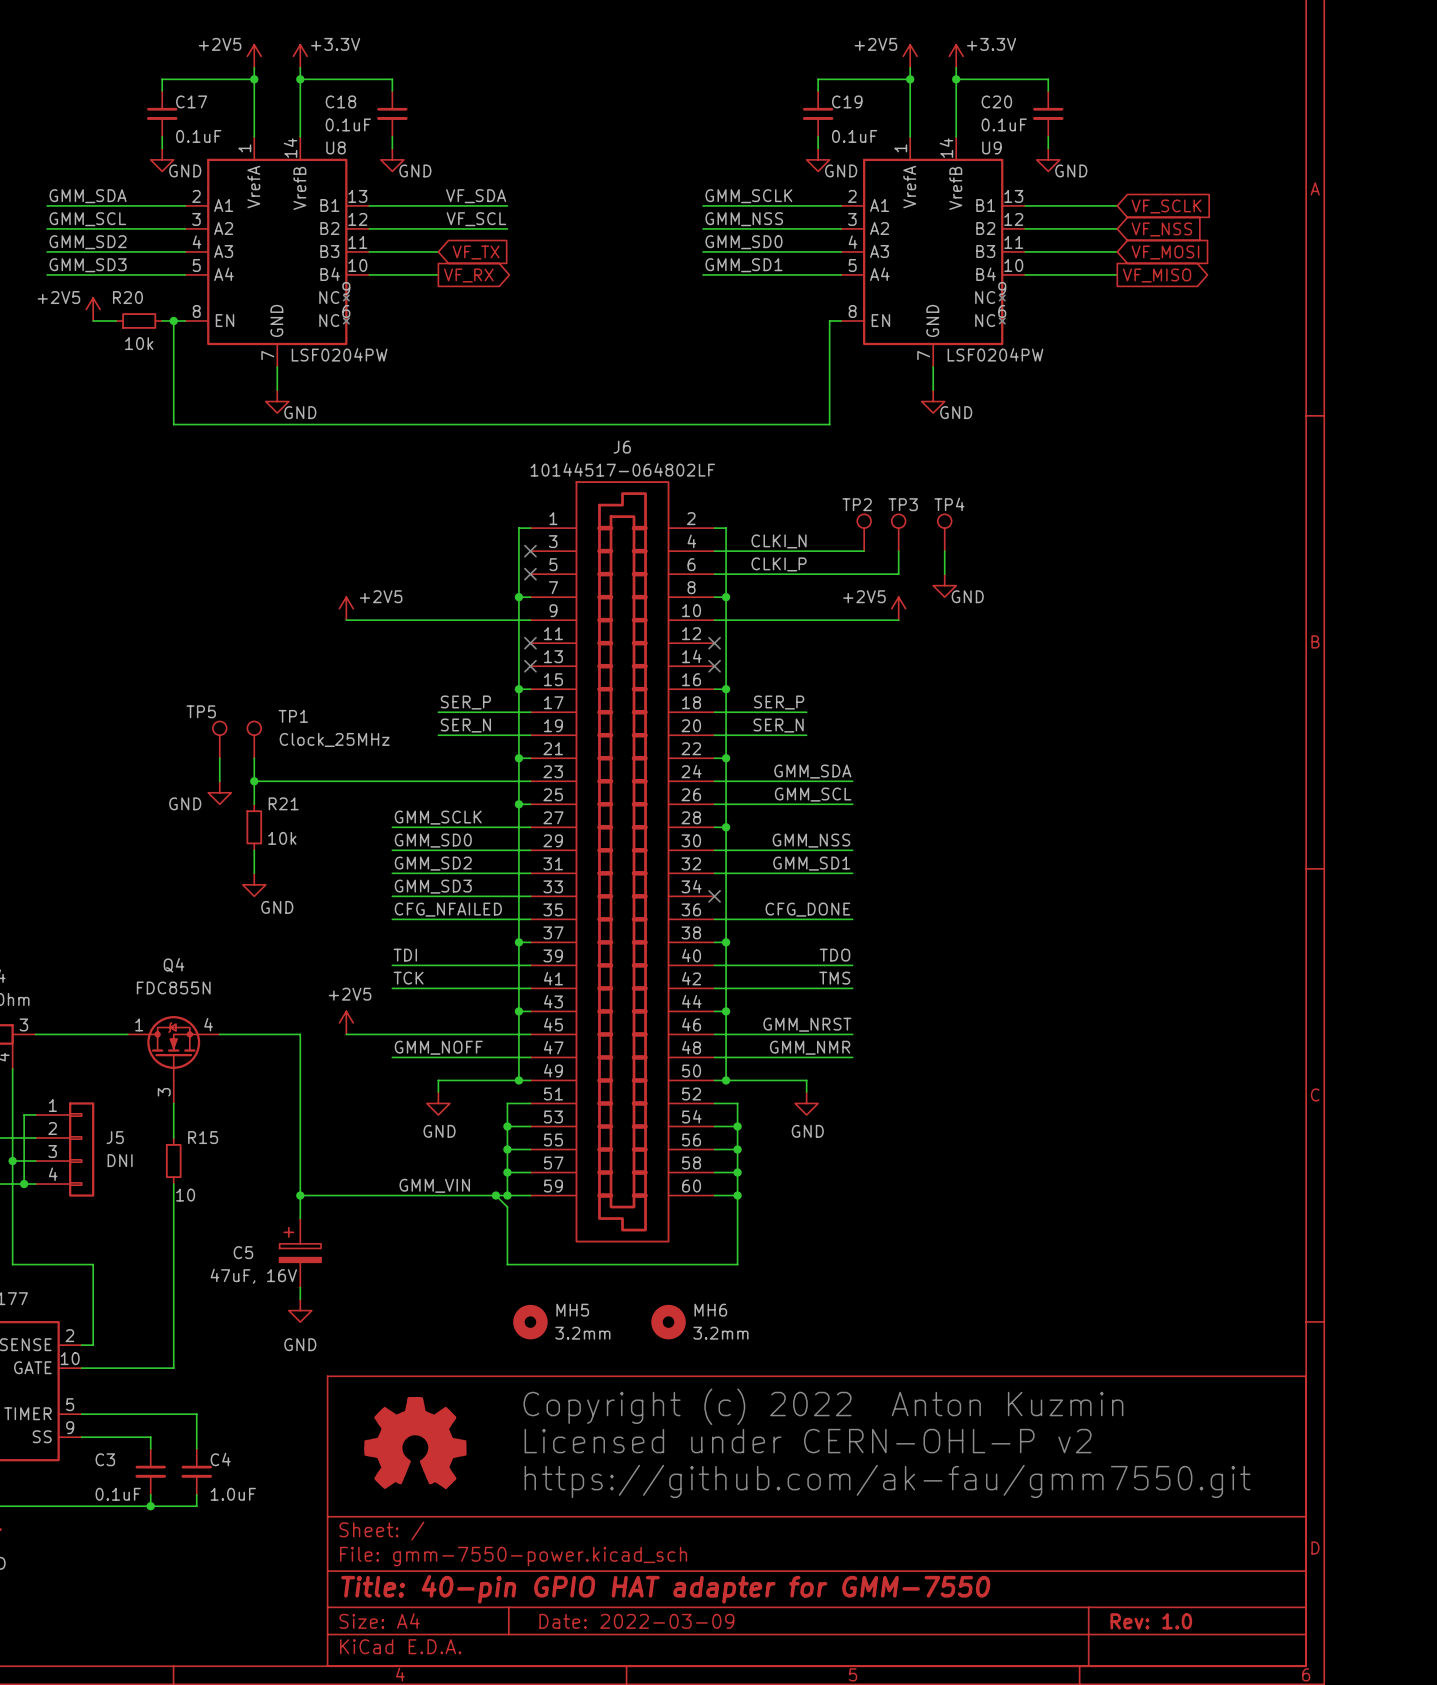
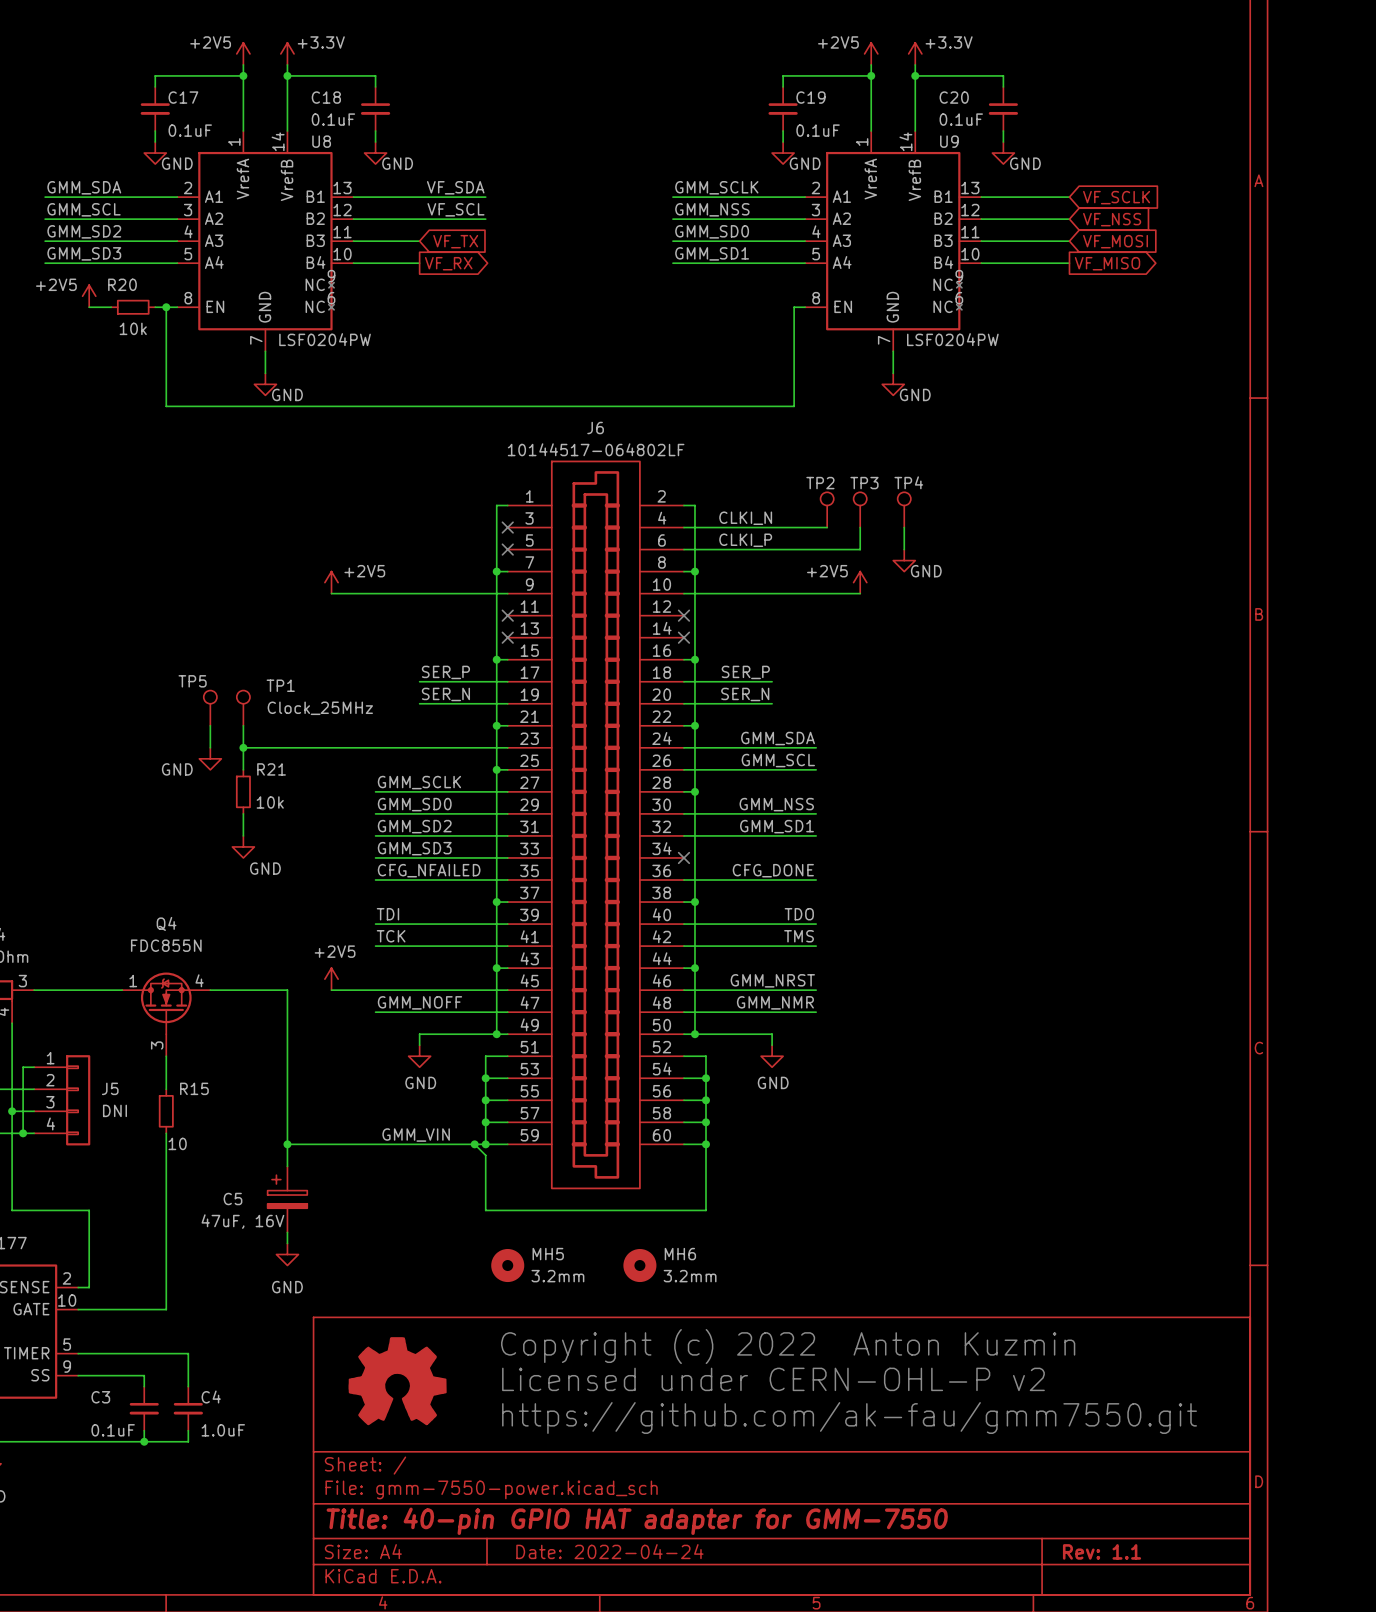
title block: Date: 2022-03-09 (636, 1621) -> Date: 2022-04-24 (609, 1551)
title block: Rev: 1.0 (1151, 1621) -> Rev: 1.1 (1102, 1551)

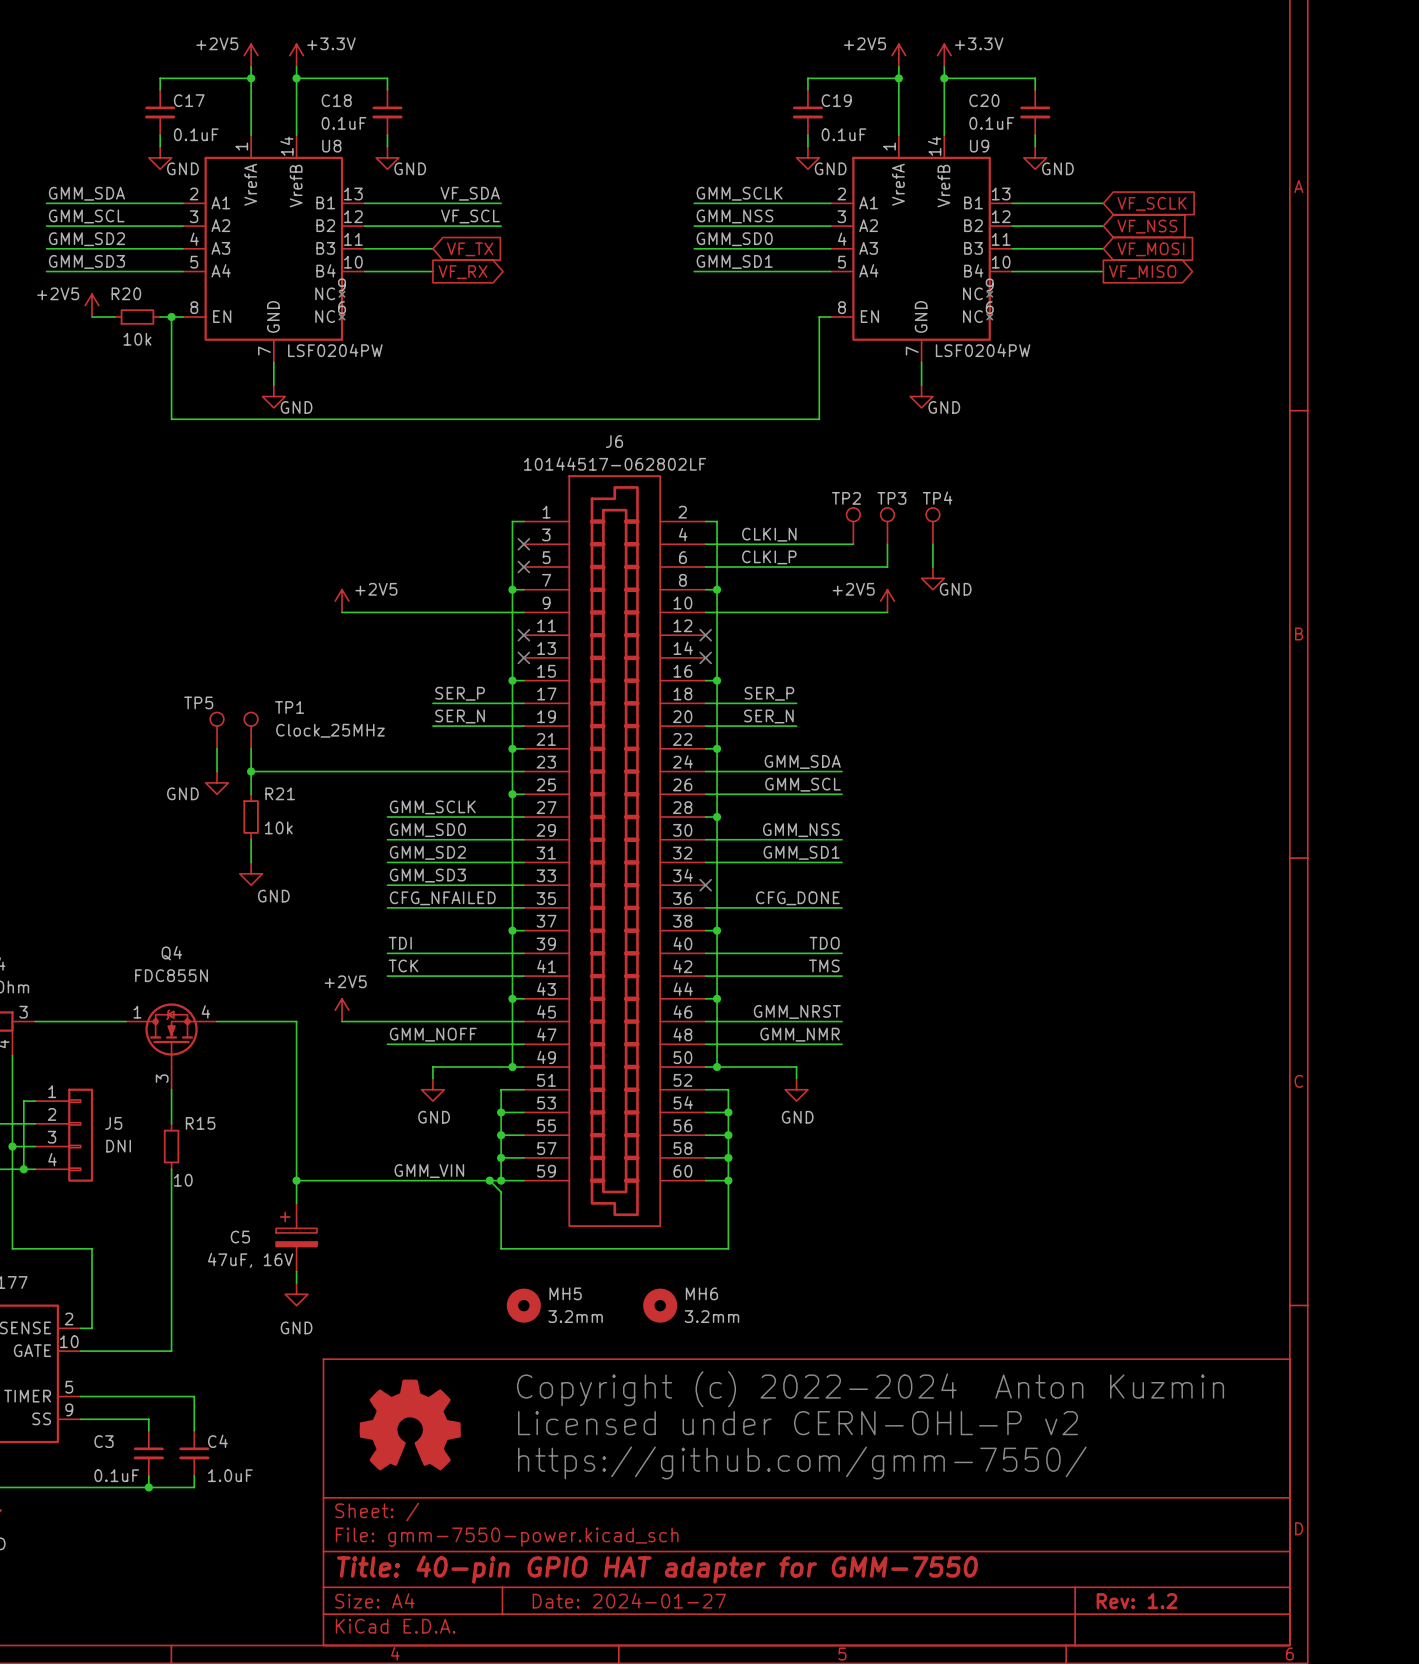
J6 value: 10144517-064802LF (596, 449) -> 10144517-062802LF (615, 464)
text: Copyright (c) 2022 Anton Kuzmin (788, 1346) -> Copyright (c) 2022-2024 Anton Kuzmin (870, 1389)
text: https://github.com/ak-fau/gmm7550.git (849, 1418) -> https://github.com/gmm-7550/ (802, 1462)
title block: Date: 2022-04-24 (609, 1551) -> Date: 2024-01-27 (629, 1600)
title block: Rev: 1.1 (1102, 1551) -> Rev: 1.2 (1136, 1601)

